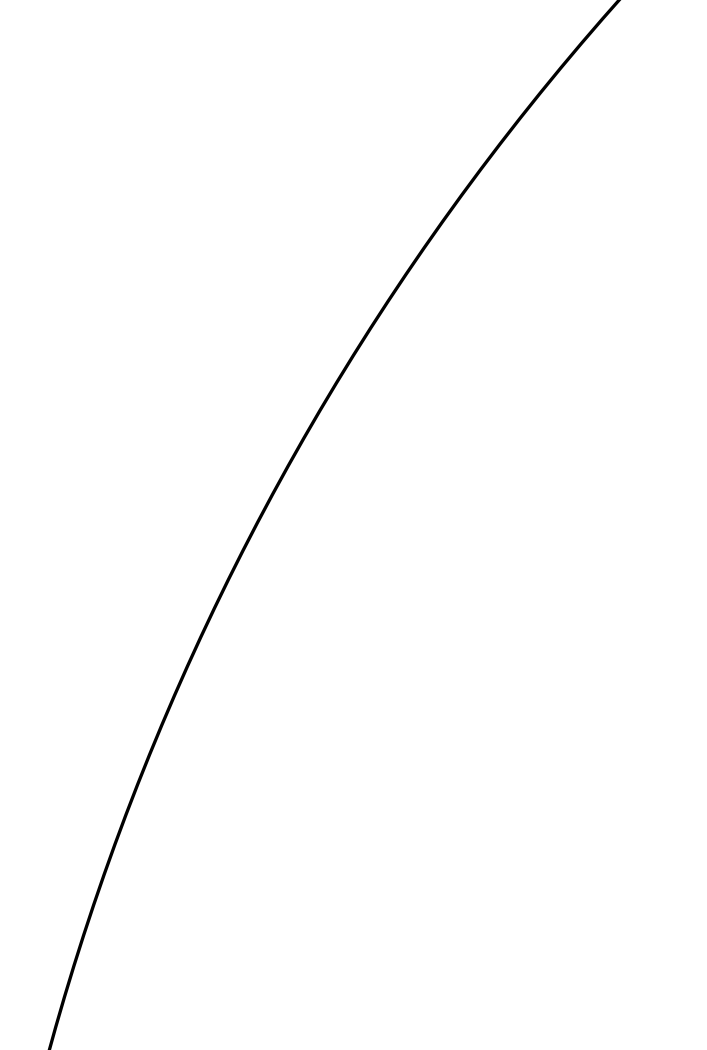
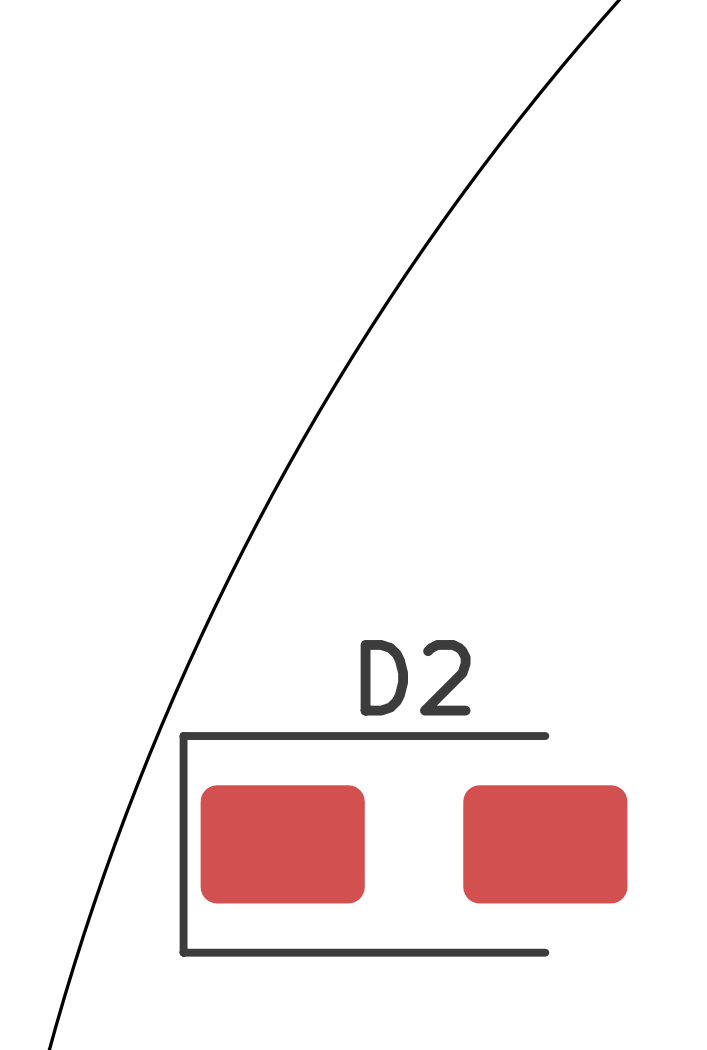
D2: none -> (403, 844)

